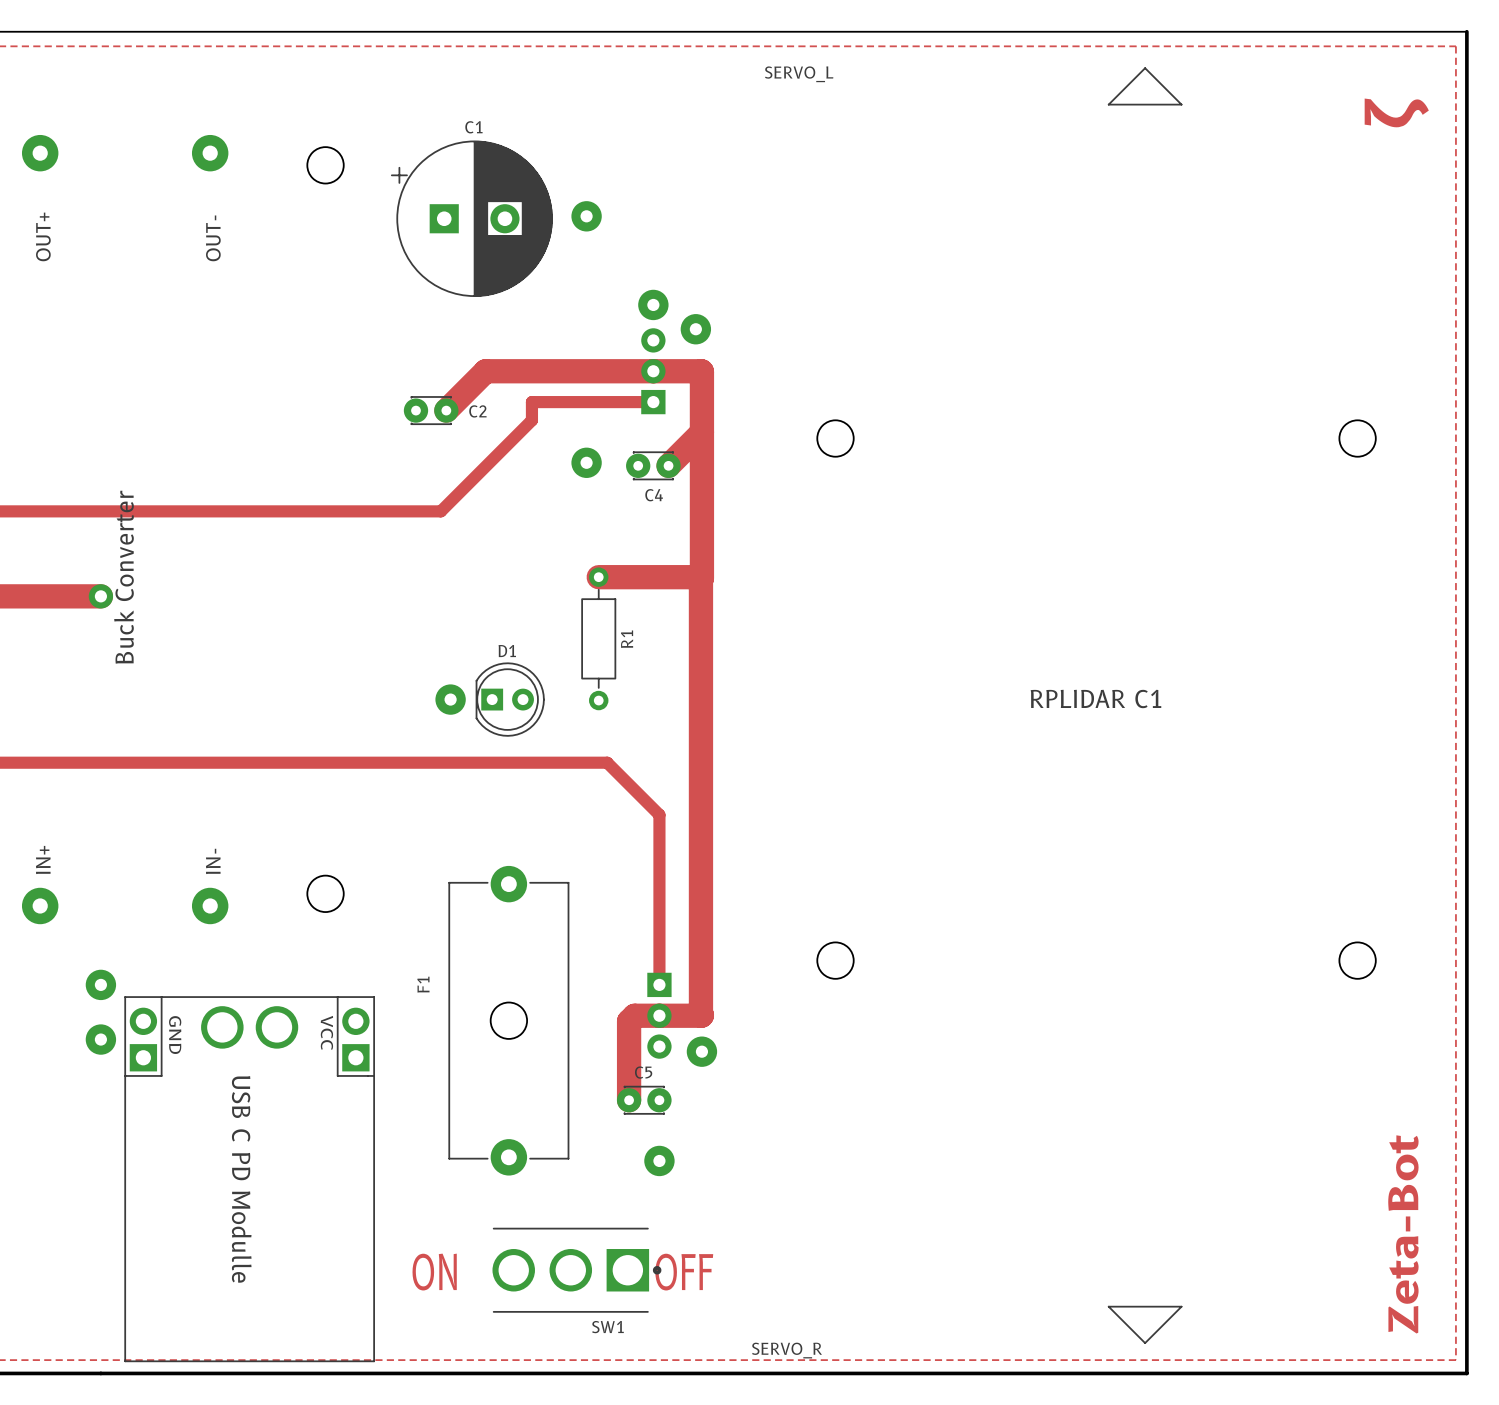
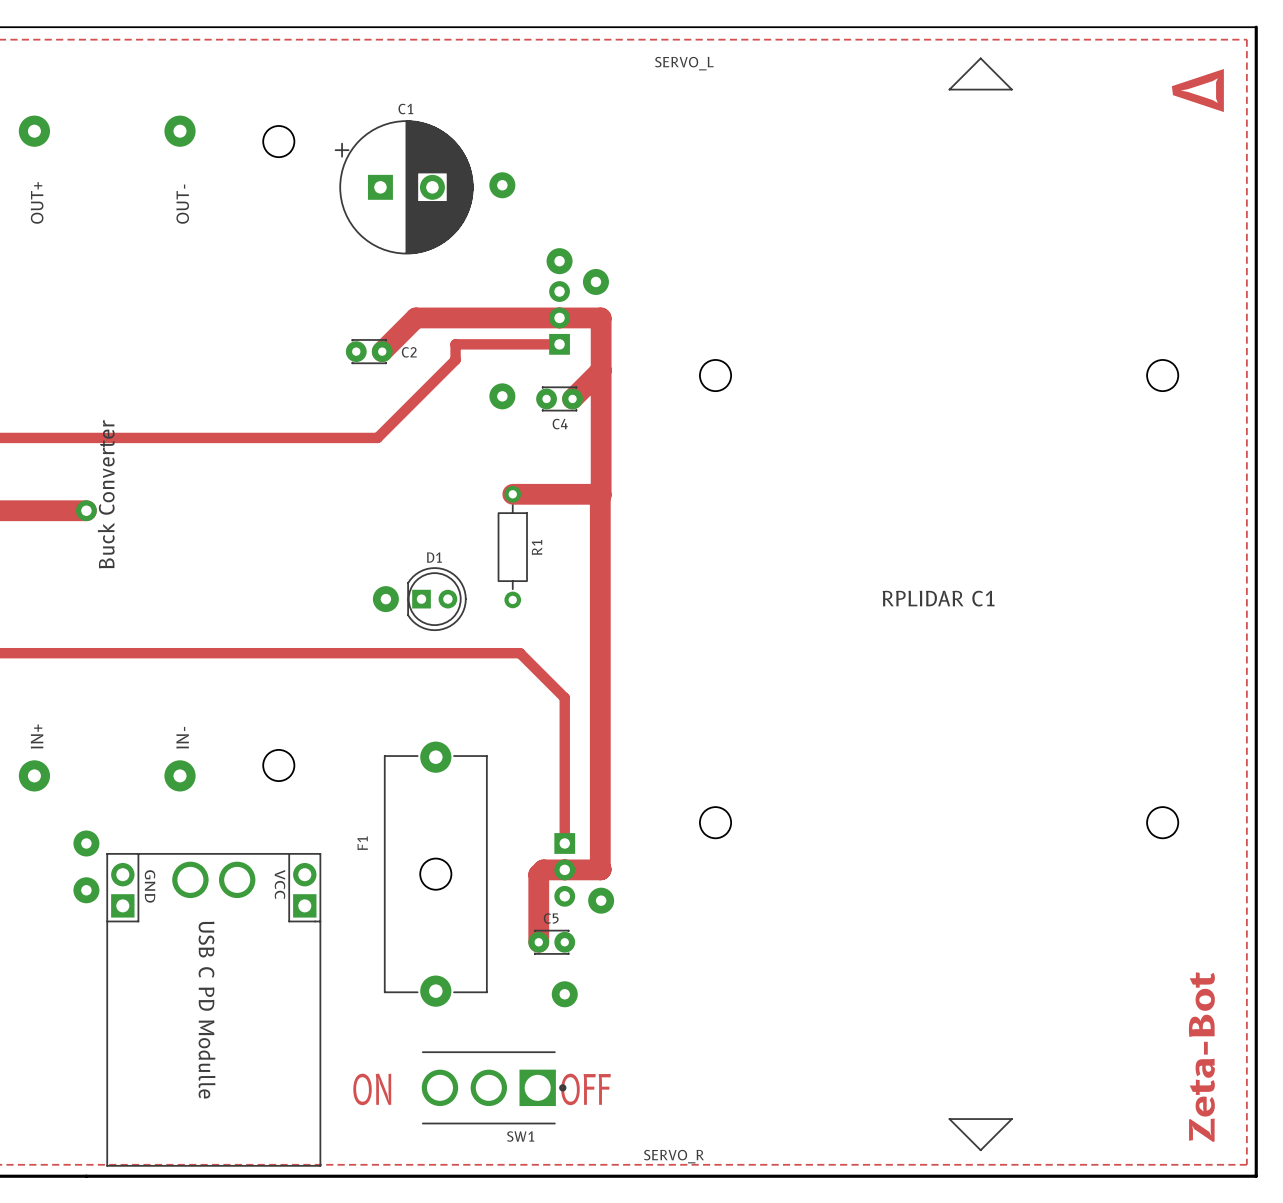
text: none -> Δ (1197, 90)
text: ζ (1396, 112) -> none

